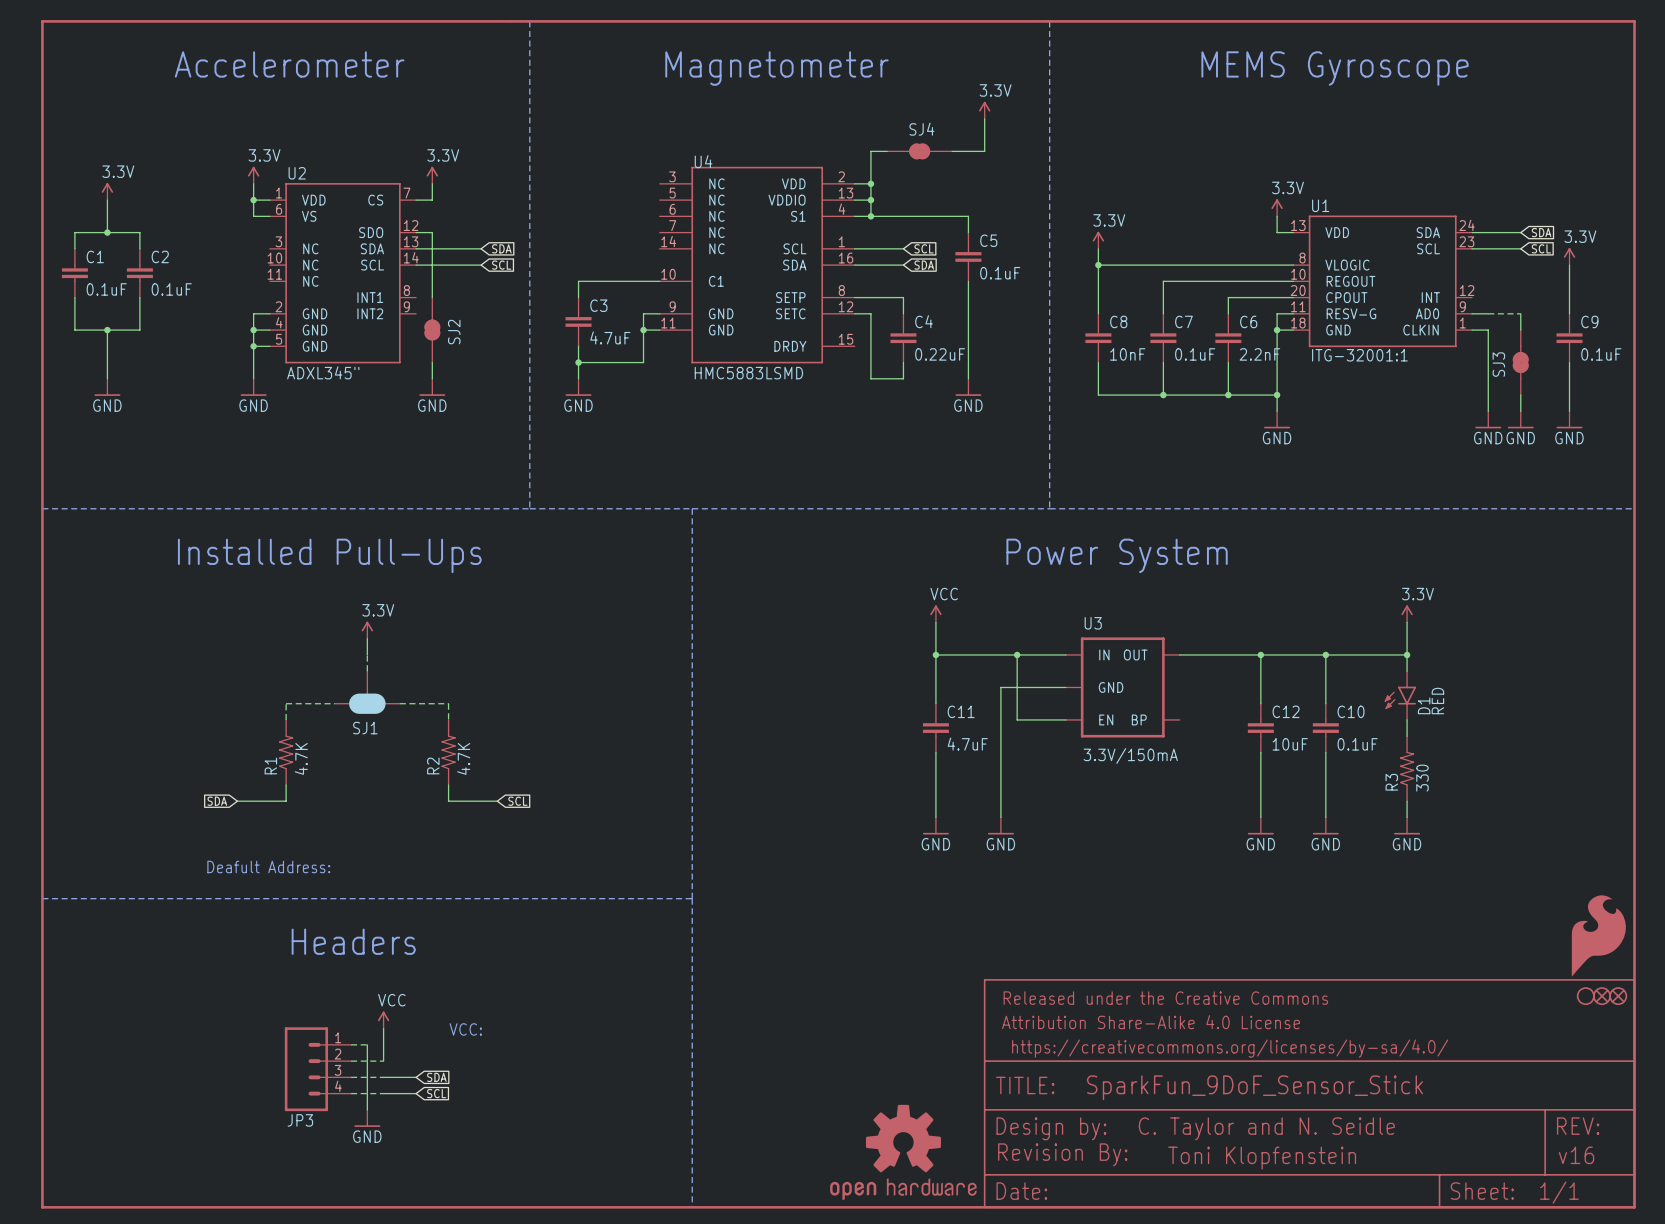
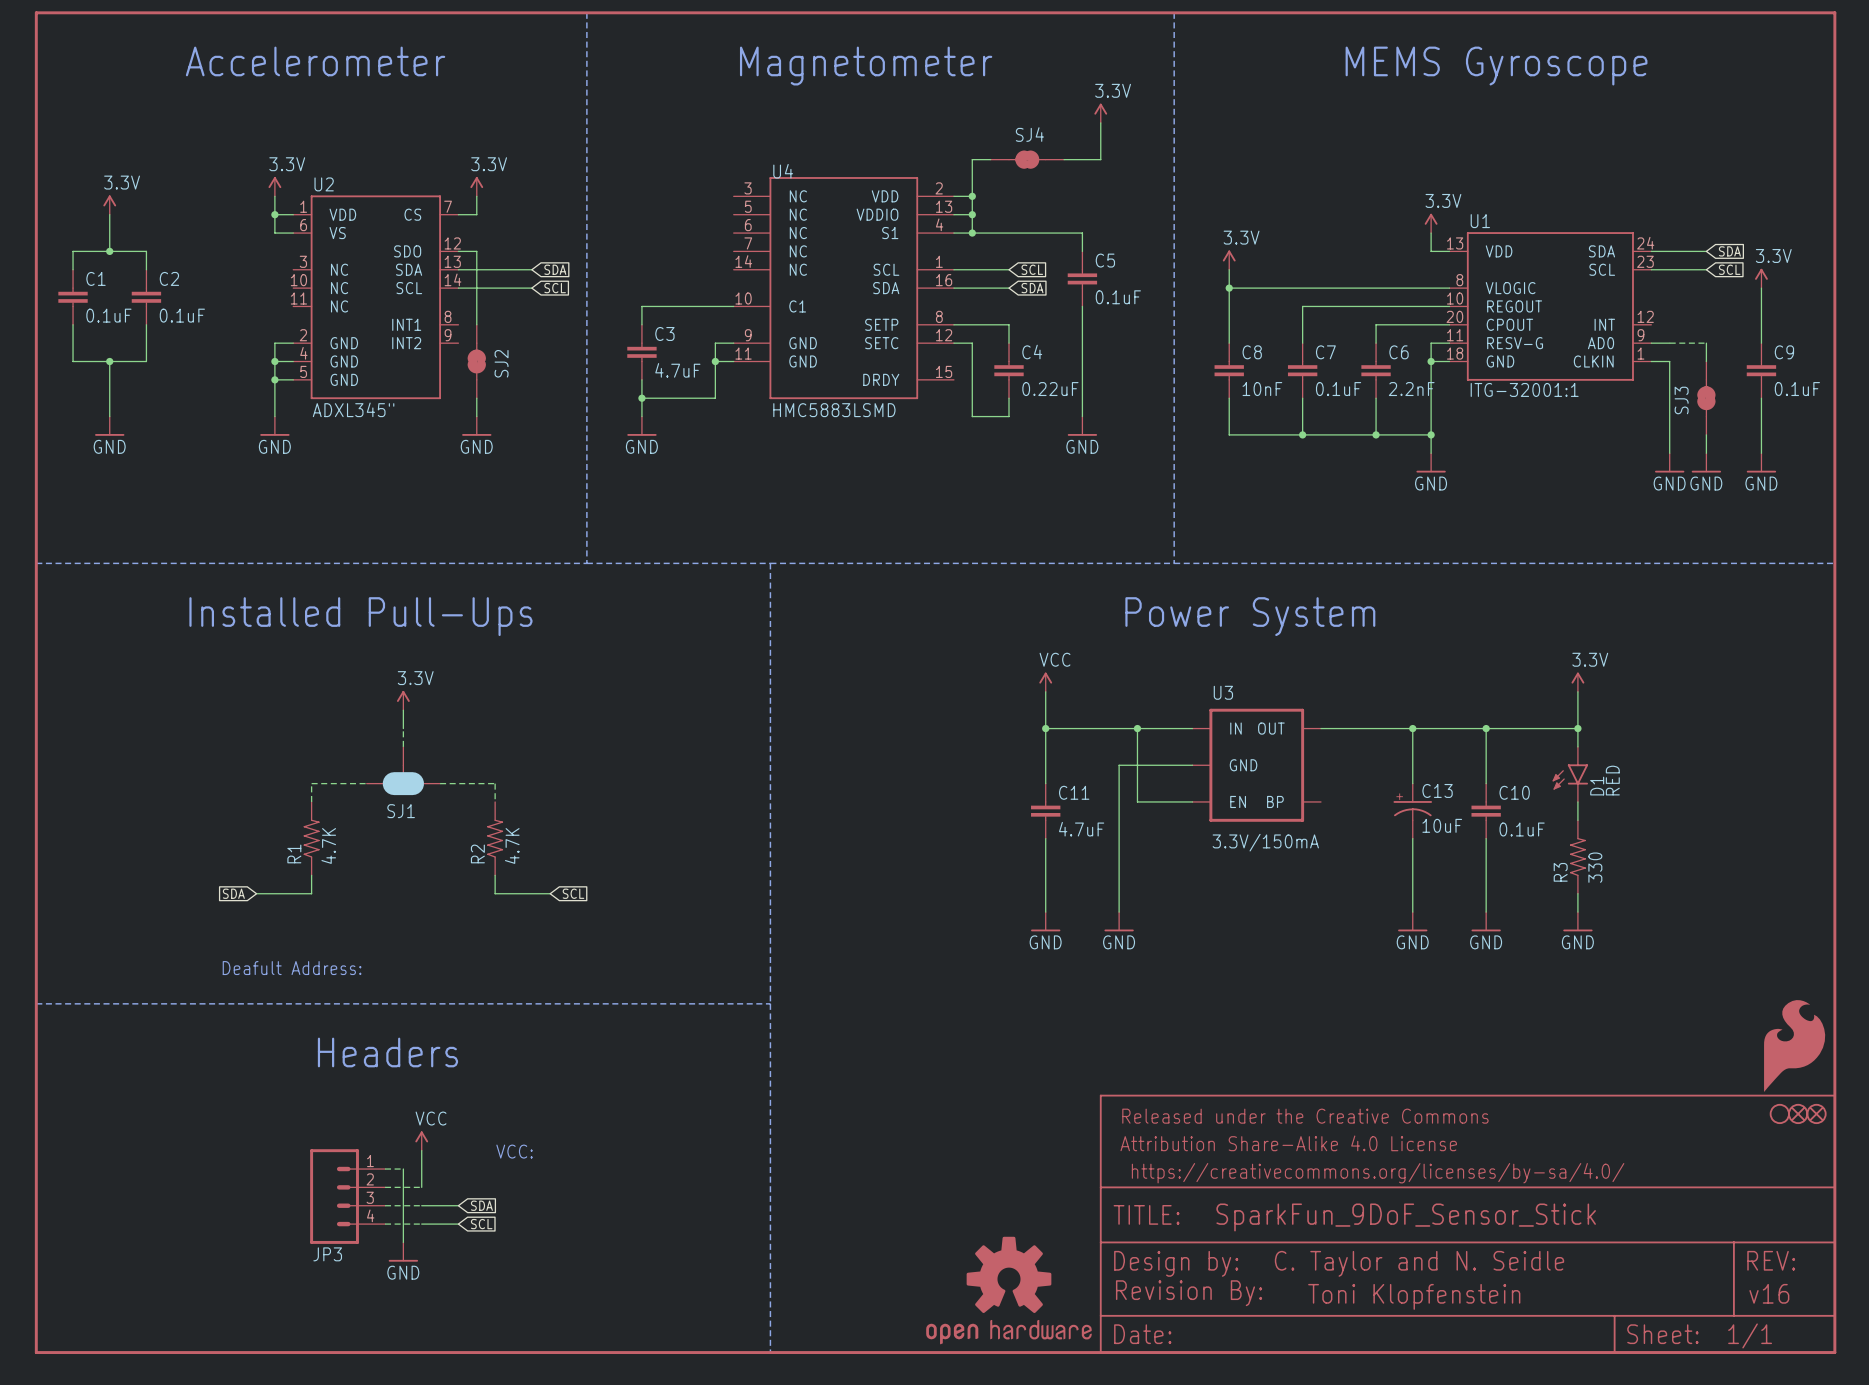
C12: 10uF (1260, 728) -> none
C13: none -> 10uF (1412, 811)

